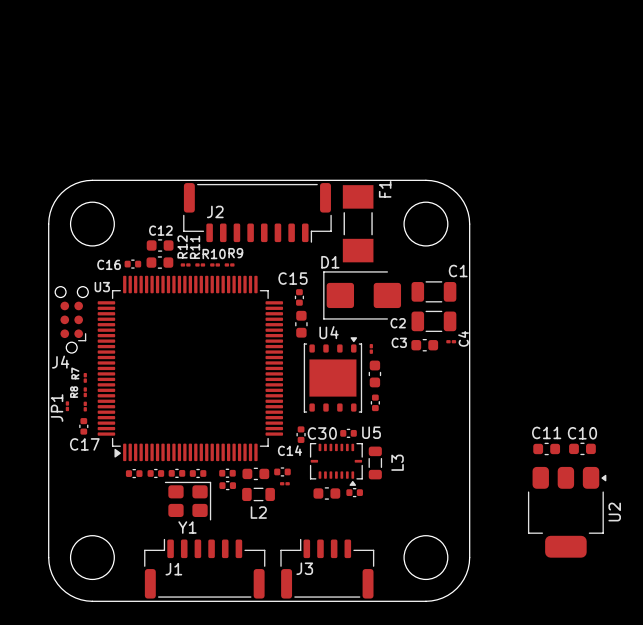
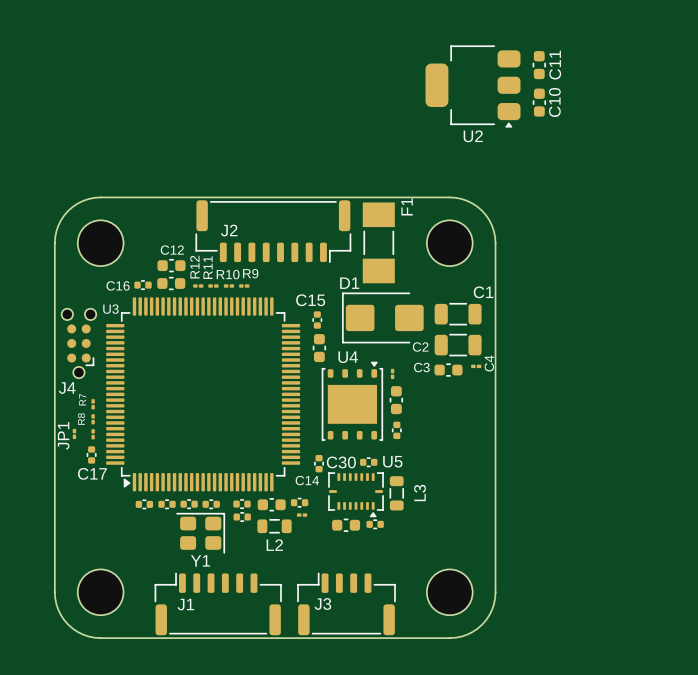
C11 rotation: 0° (546, 448) -> 90° clockwise (539, 65)
C11 position: (546, 448) -> (539, 65)
C10 rotation: 0° (582, 448) -> 90° clockwise (539, 102)
C10 position: (582, 448) -> (539, 102)
U2 rotation: 0° (567, 512) -> 90° clockwise (473, 86)
U2 position: (567, 512) -> (473, 86)

